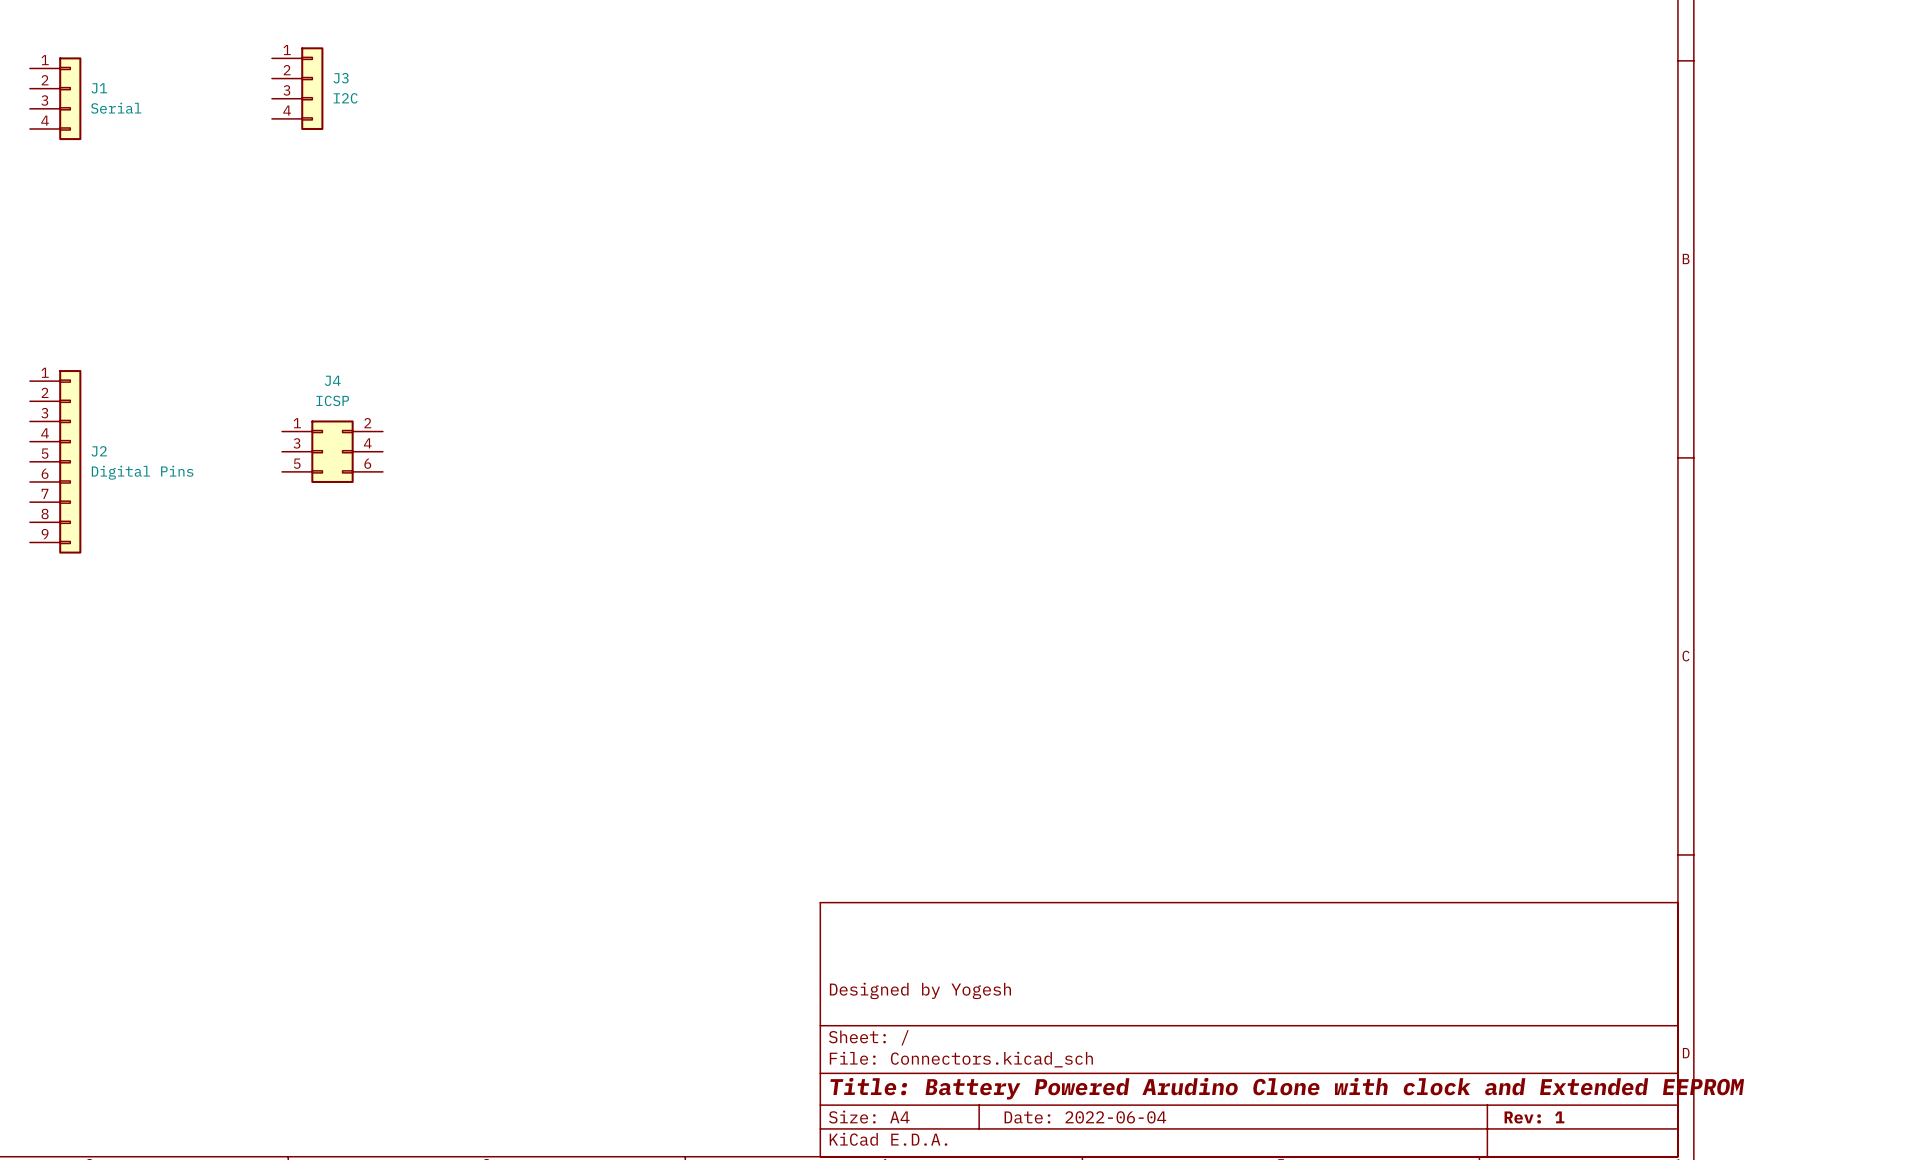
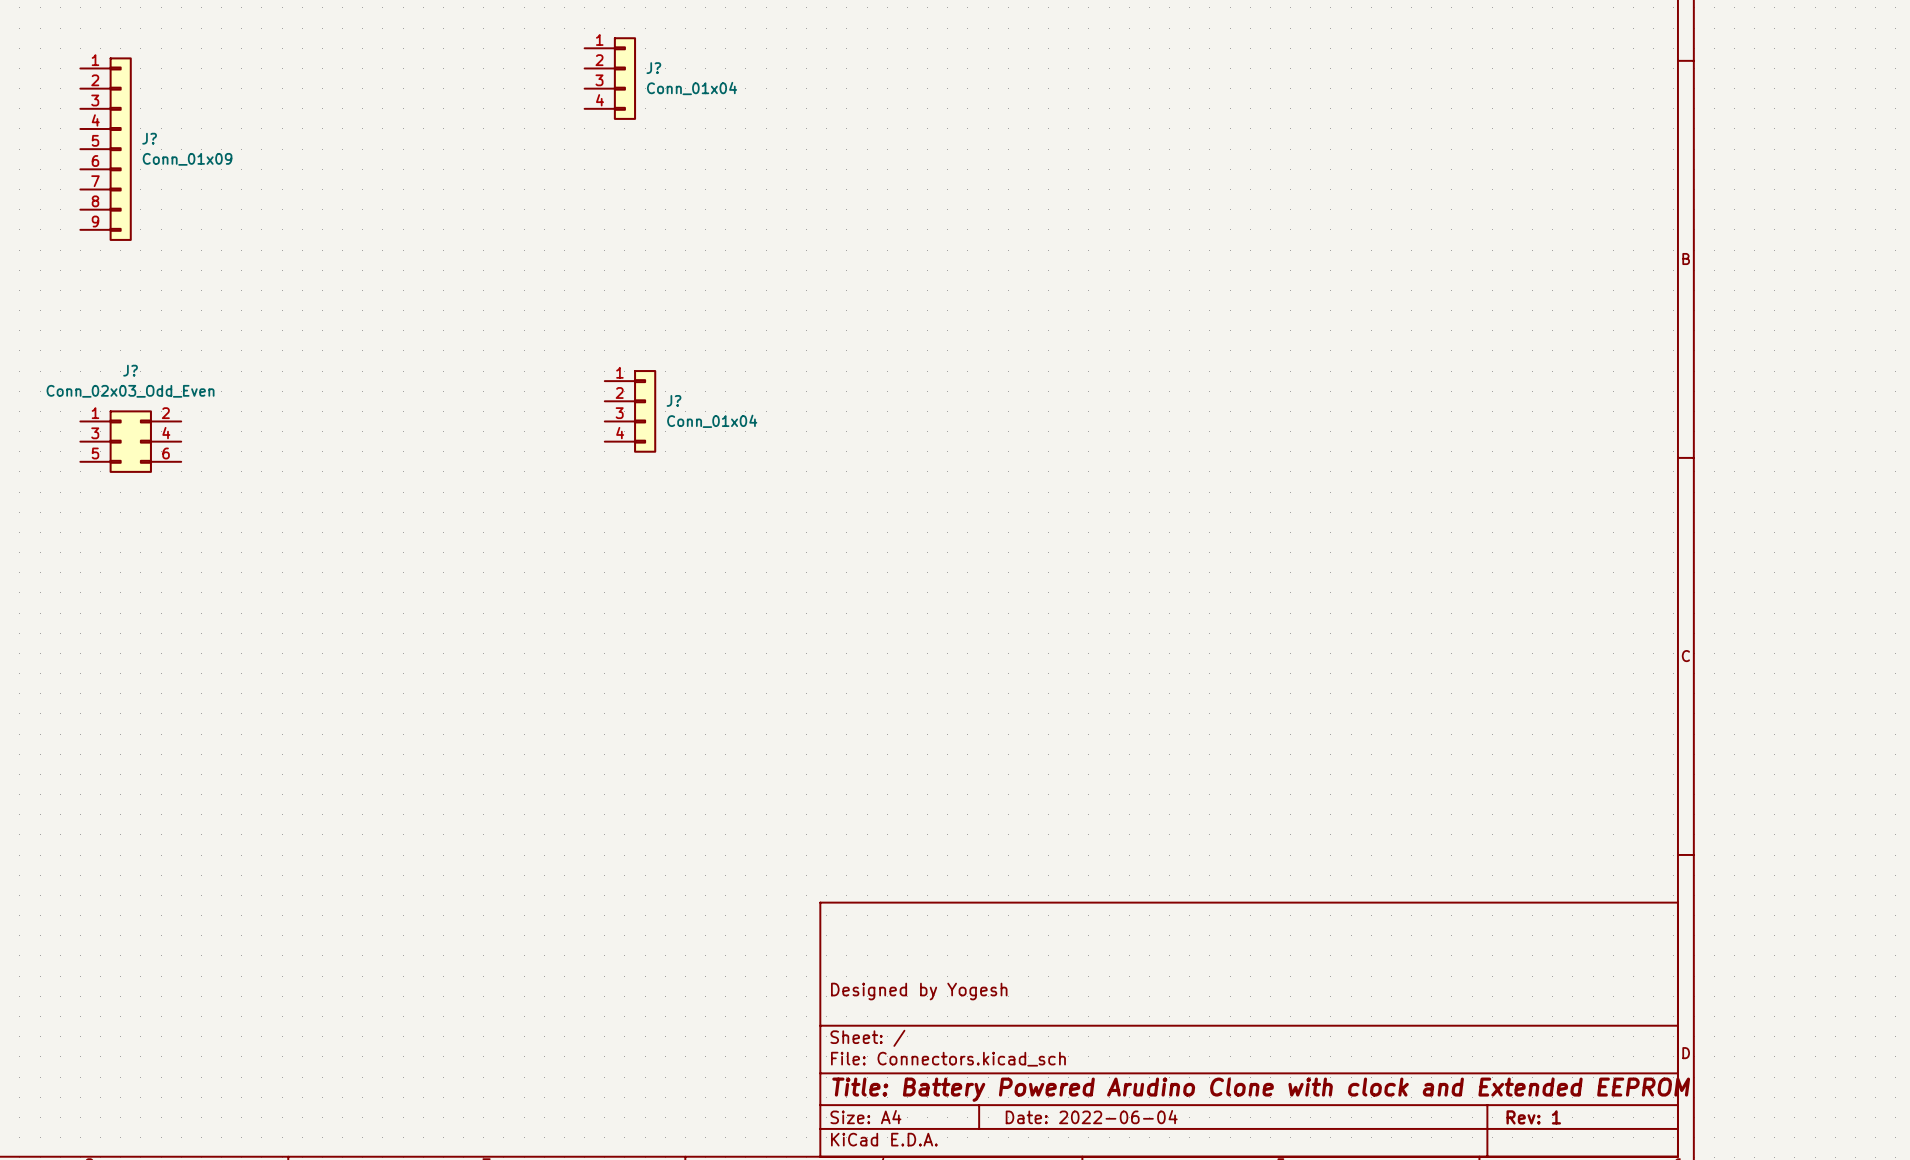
J?: none -> Conn_01x04 (610, 78)
J3: I2C (297, 88) -> none
J1: Serial (55, 98) -> none
J?: none -> Conn_01x09 (106, 149)
J?: none -> Conn_01x04 (630, 411)
J?: none -> Conn_02x03_Odd_Even (130, 441)
J4: ICSP (332, 451) -> none
J2: Digital Pins (55, 461) -> none

